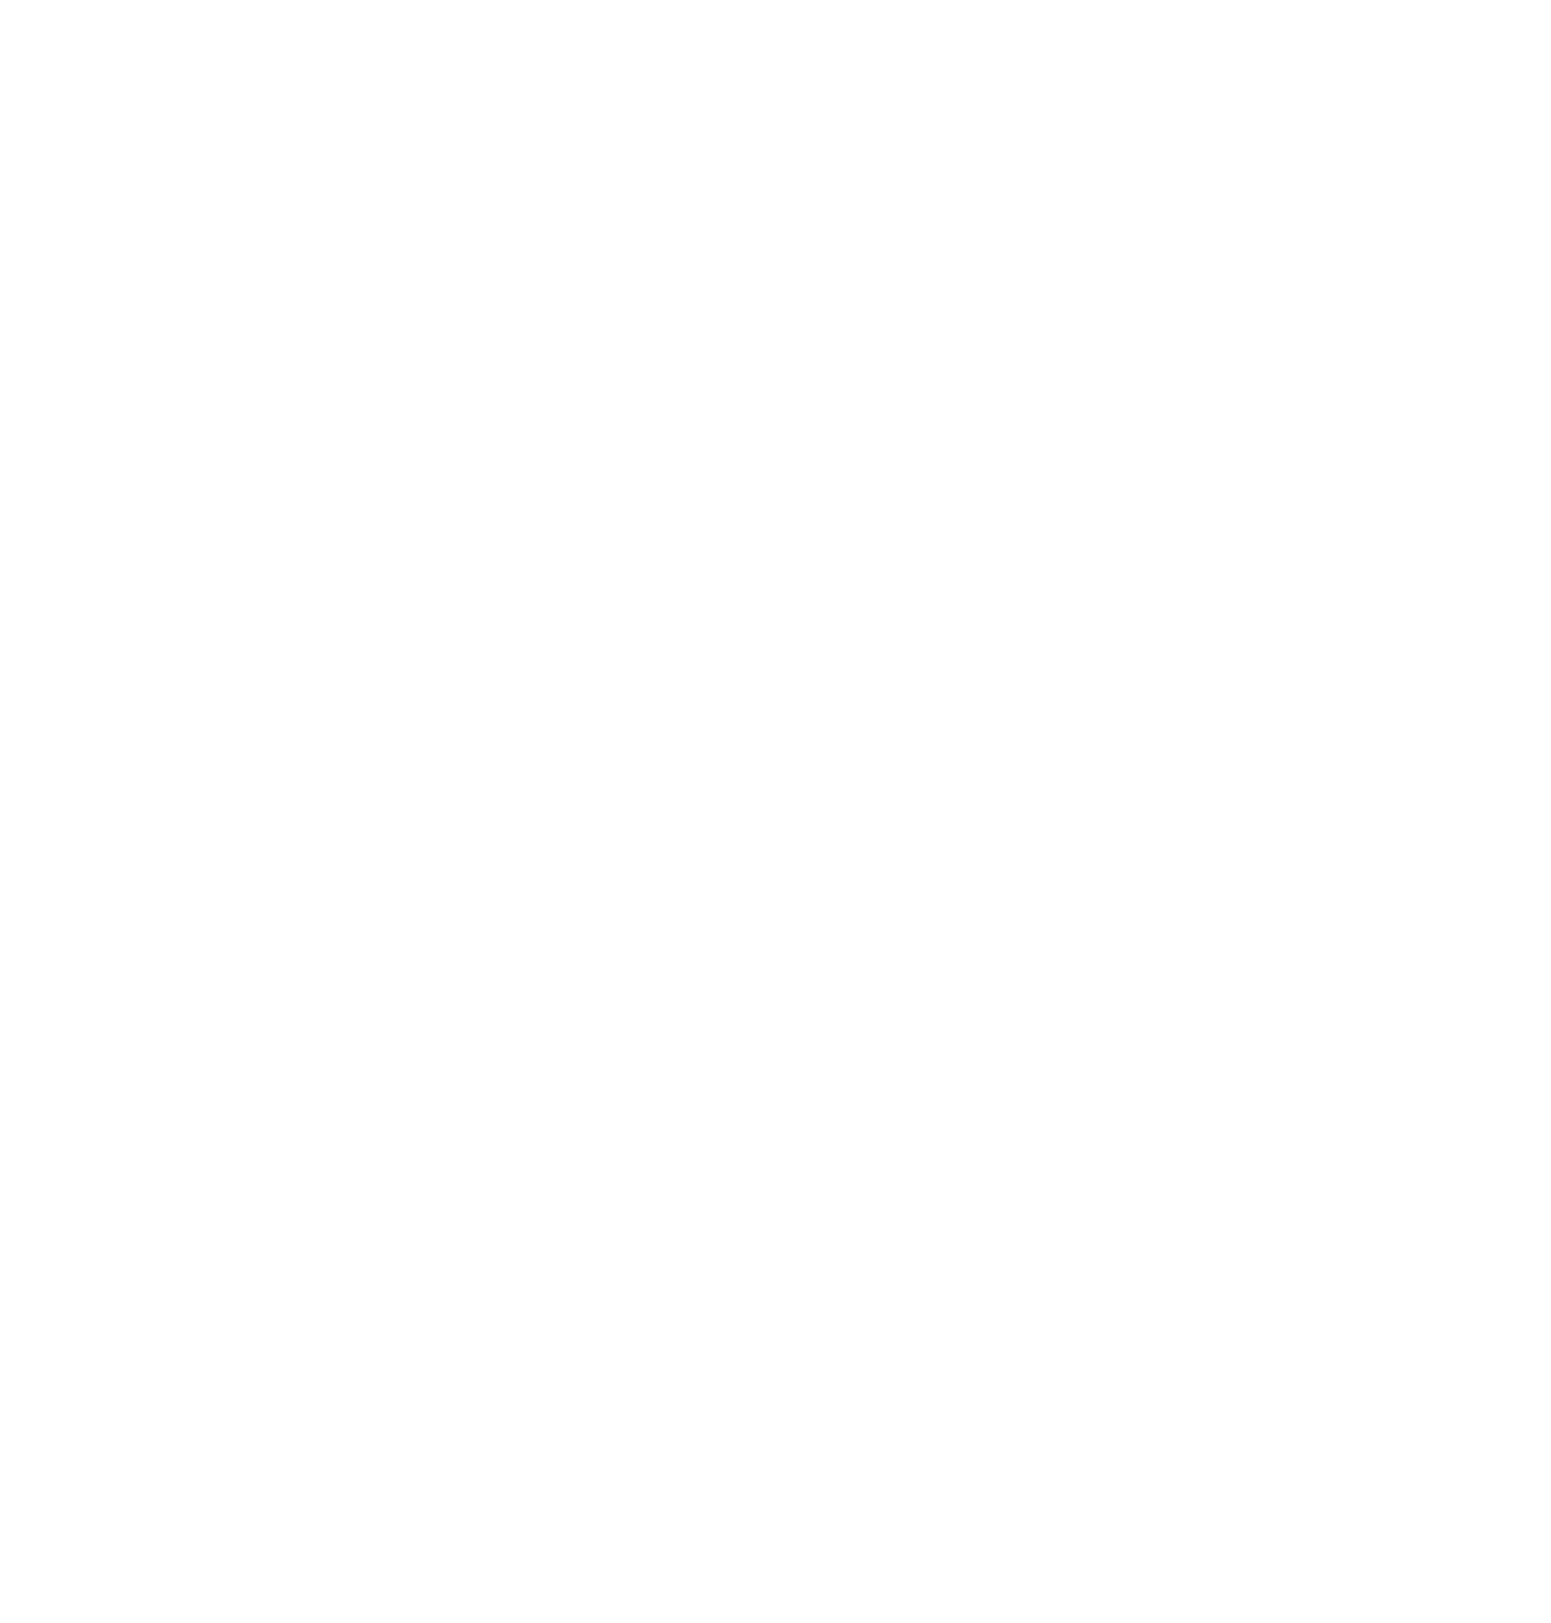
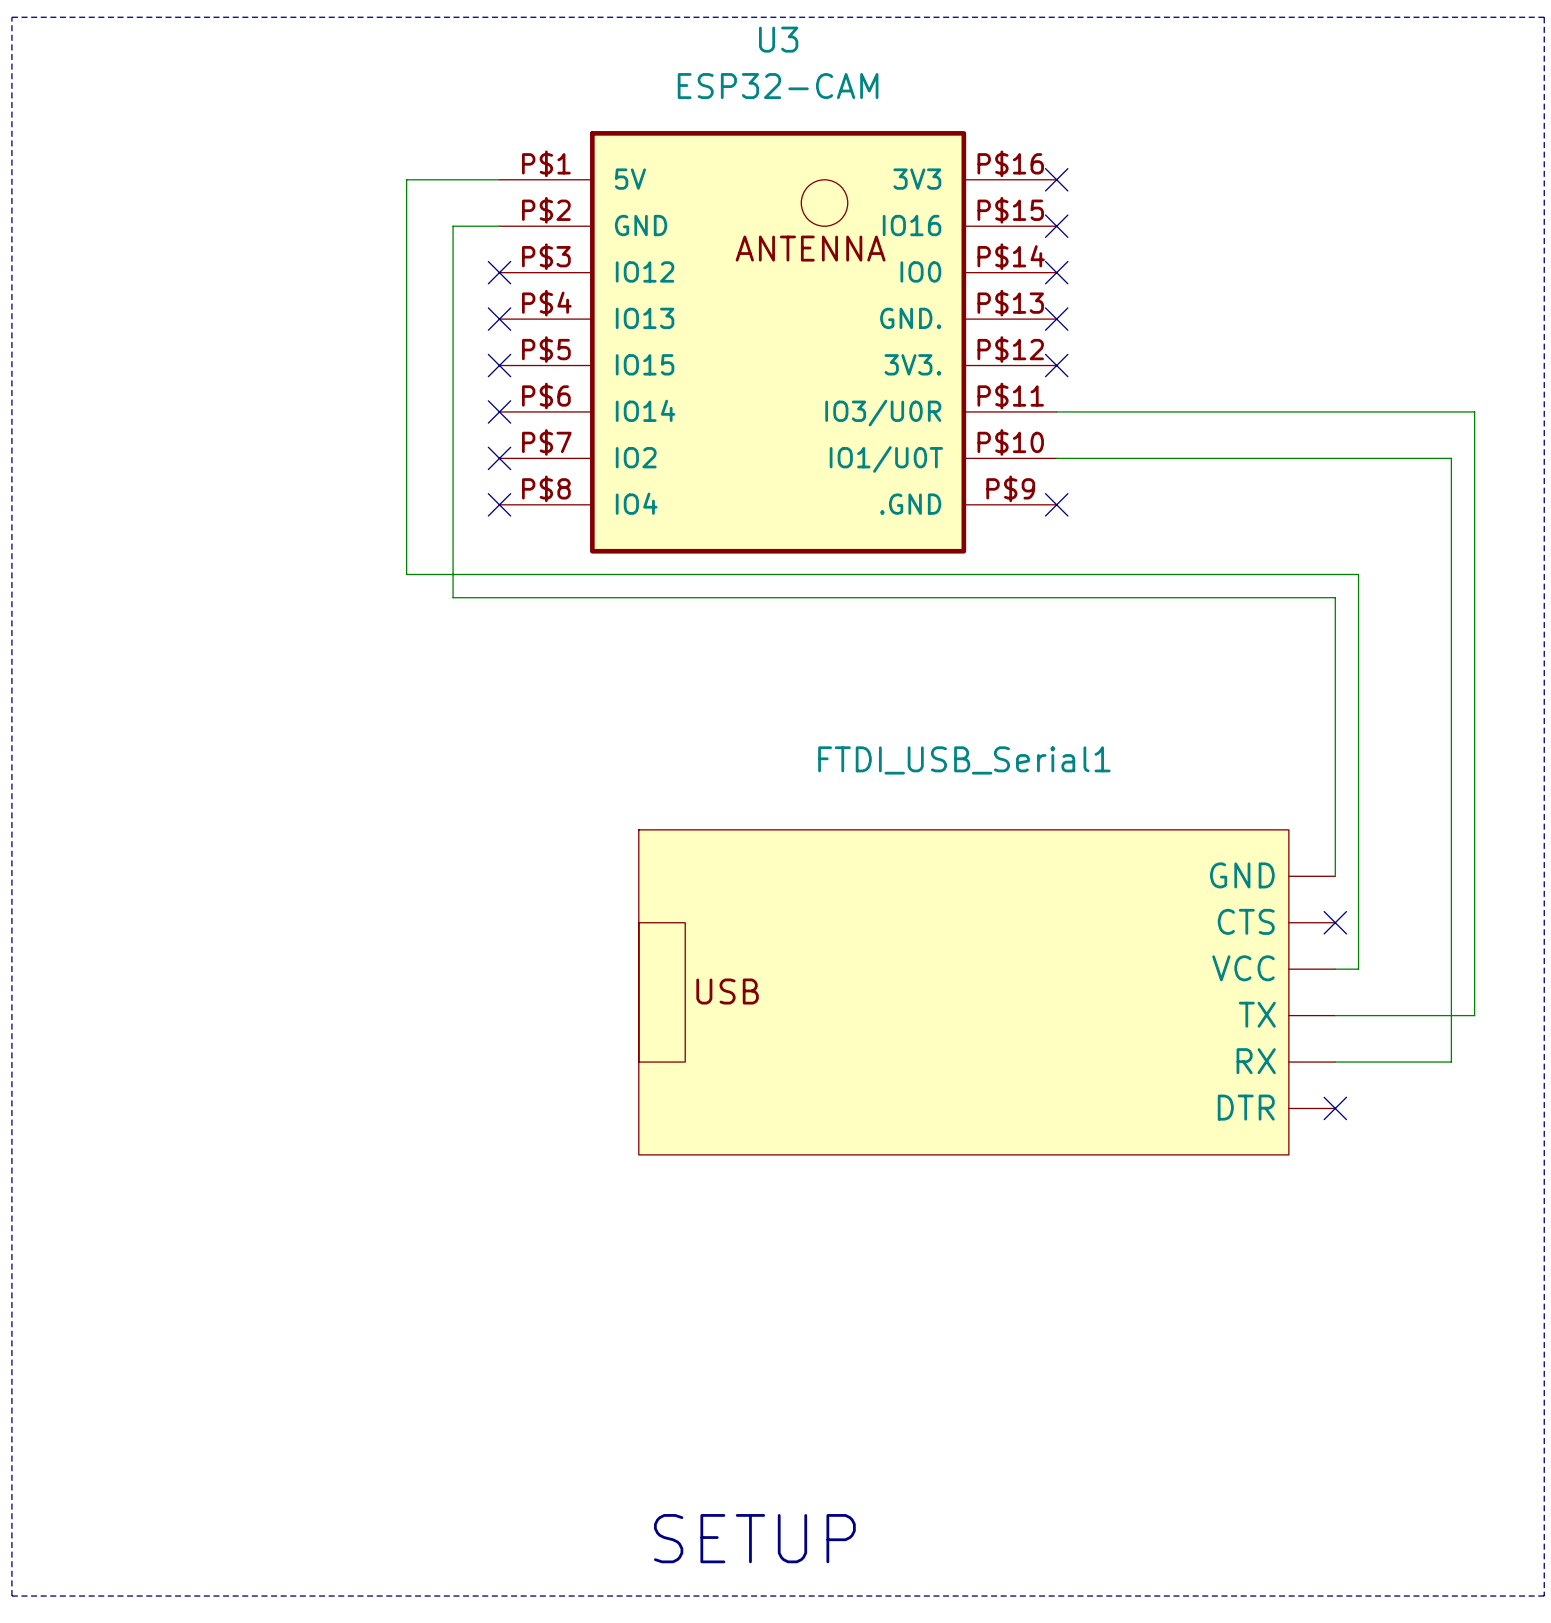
line: none -> (11, 17) (1544, 17) (1544, 1596) (11, 1596) (11, 17)
wire: none -> (499, 179) (406, 179) (406, 574) (1358, 574) (1358, 969) (1335, 969)
no-connect mark: none -> (1056, 179)
wire: none -> (499, 226) (453, 226) (453, 597) (1335, 597) (1335, 876)
no-connect mark: none -> (1056, 226)
no-connect mark: none -> (499, 272)
no-connect mark: none -> (1056, 272)
no-connect mark: none -> (499, 319)
no-connect mark: none -> (1056, 319)
U3: none -> ESP32-CAM (778, 342)
no-connect mark: none -> (499, 365)
no-connect mark: none -> (1056, 365)
no-connect mark: none -> (499, 411)
wire: none -> (1056, 411) (1474, 411) (1474, 1015) (1335, 1015)
no-connect mark: none -> (499, 458)
wire: none -> (1056, 458) (1451, 458) (1451, 1062) (1335, 1062)
no-connect mark: none -> (499, 504)
no-connect mark: none -> (1056, 504)
no-connect mark: none -> (1335, 922)
FTDI_USB_Serial1: none -> (987, 992)
no-connect mark: none -> (1335, 1108)
text: none -> SETUP (754, 1538)

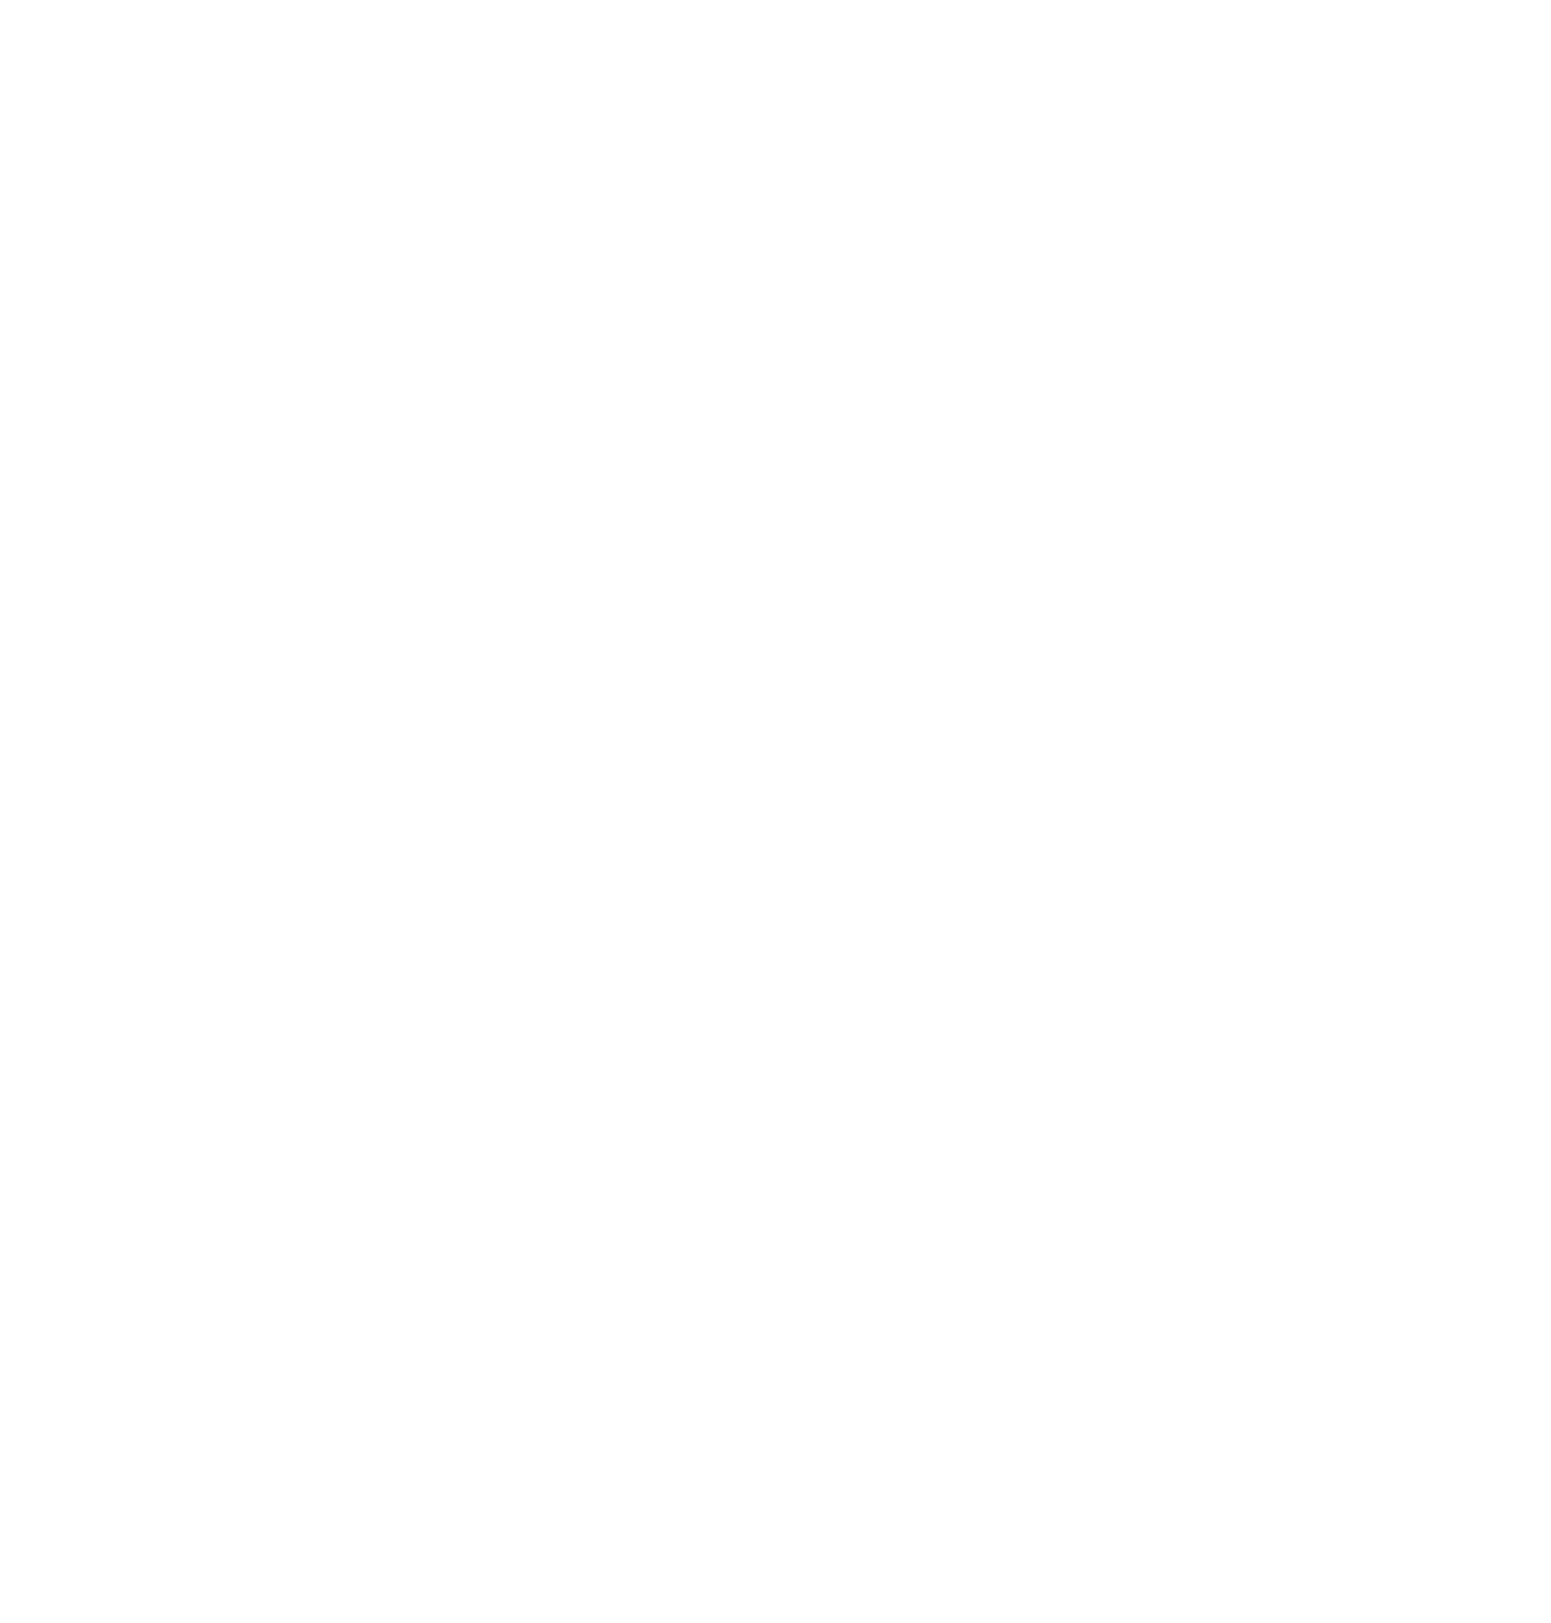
line: (11, 17) (1544, 17) (1544, 1596) (11, 1596) (11, 17) -> none
wire: (499, 179) (406, 179) (406, 574) (1358, 574) (1358, 969) (1335, 969) -> none
no-connect mark: (1056, 179) -> none
wire: (499, 226) (453, 226) (453, 597) (1335, 597) (1335, 876) -> none
no-connect mark: (1056, 226) -> none
no-connect mark: (499, 272) -> none
no-connect mark: (1056, 272) -> none
no-connect mark: (499, 319) -> none
no-connect mark: (1056, 319) -> none
U3: ESP32-CAM (778, 342) -> none
no-connect mark: (499, 365) -> none
no-connect mark: (1056, 365) -> none
no-connect mark: (499, 411) -> none
wire: (1056, 411) (1474, 411) (1474, 1015) (1335, 1015) -> none
no-connect mark: (499, 458) -> none
wire: (1056, 458) (1451, 458) (1451, 1062) (1335, 1062) -> none
no-connect mark: (499, 504) -> none
no-connect mark: (1056, 504) -> none
no-connect mark: (1335, 922) -> none
FTDI_USB_Serial1: (987, 992) -> none
no-connect mark: (1335, 1108) -> none
text: SETUP (754, 1538) -> none

